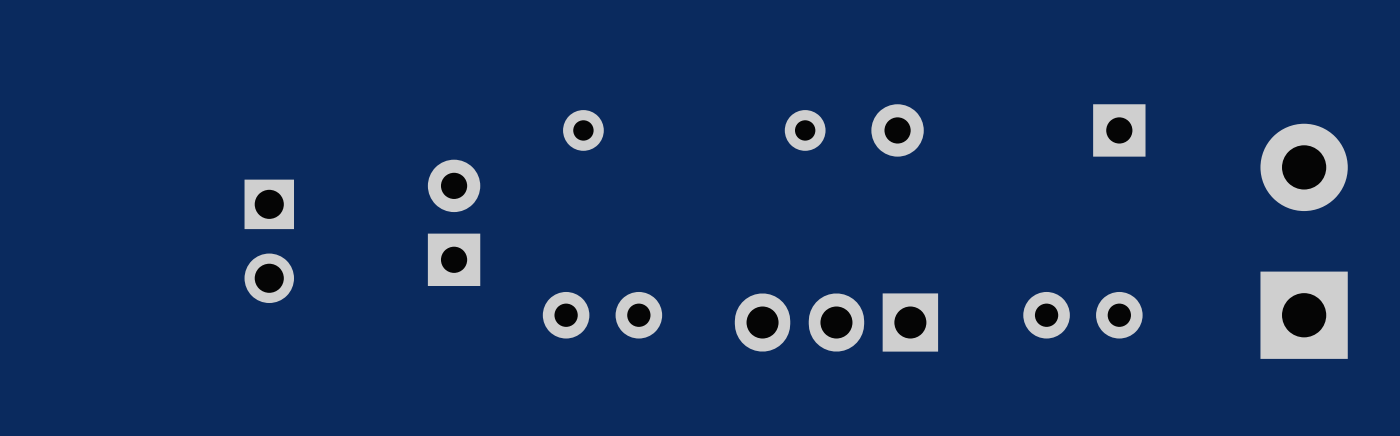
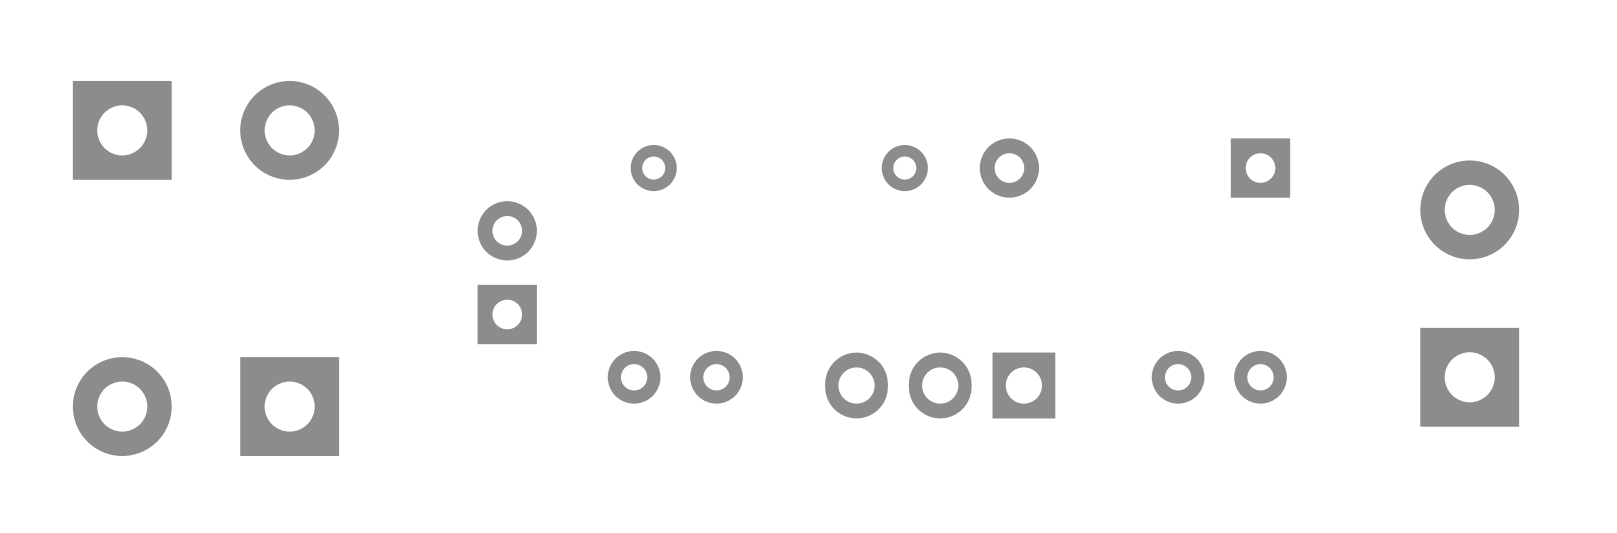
part: none -> (205, 130)
part: (269, 241) -> none
part: none -> (205, 406)

